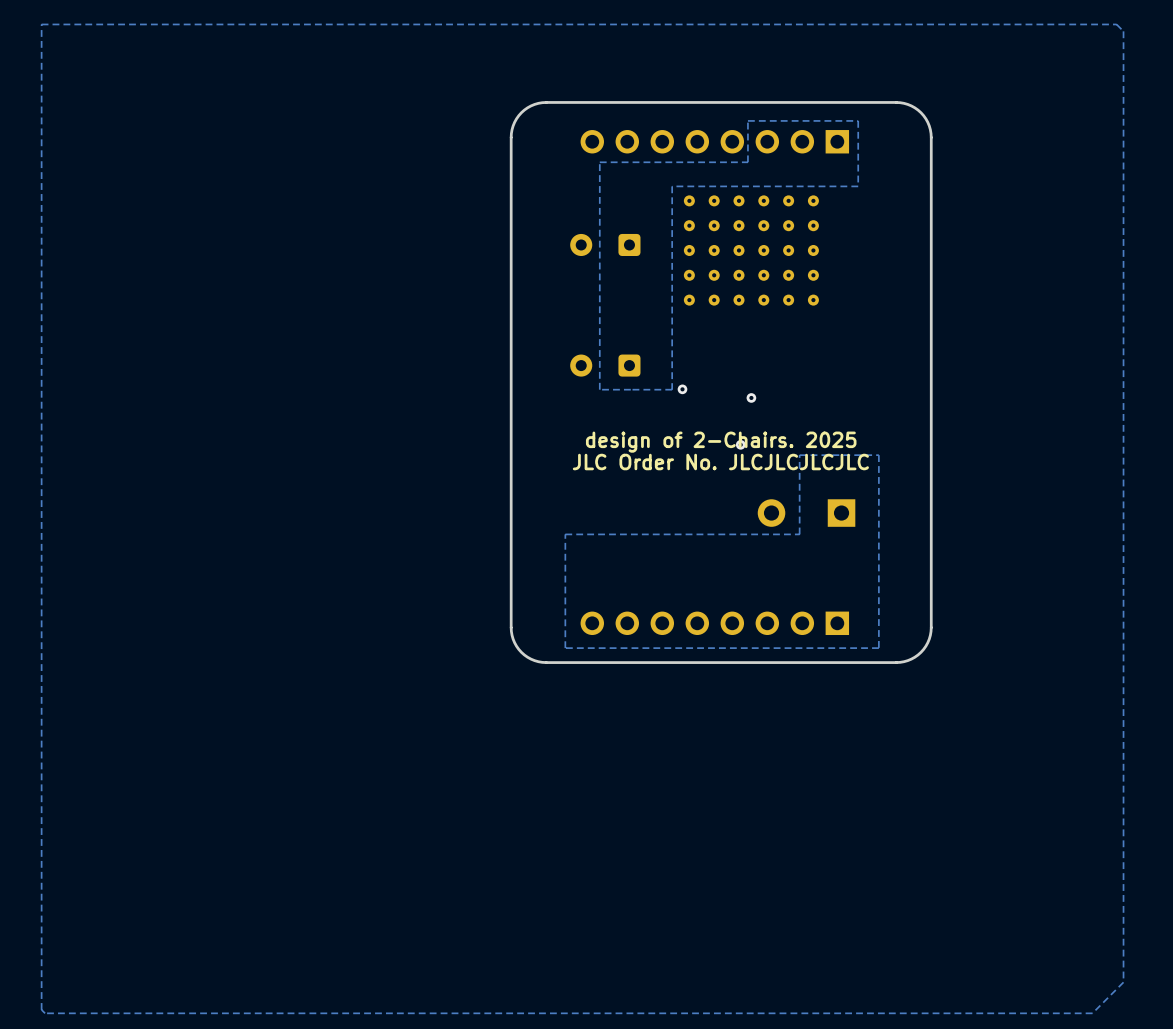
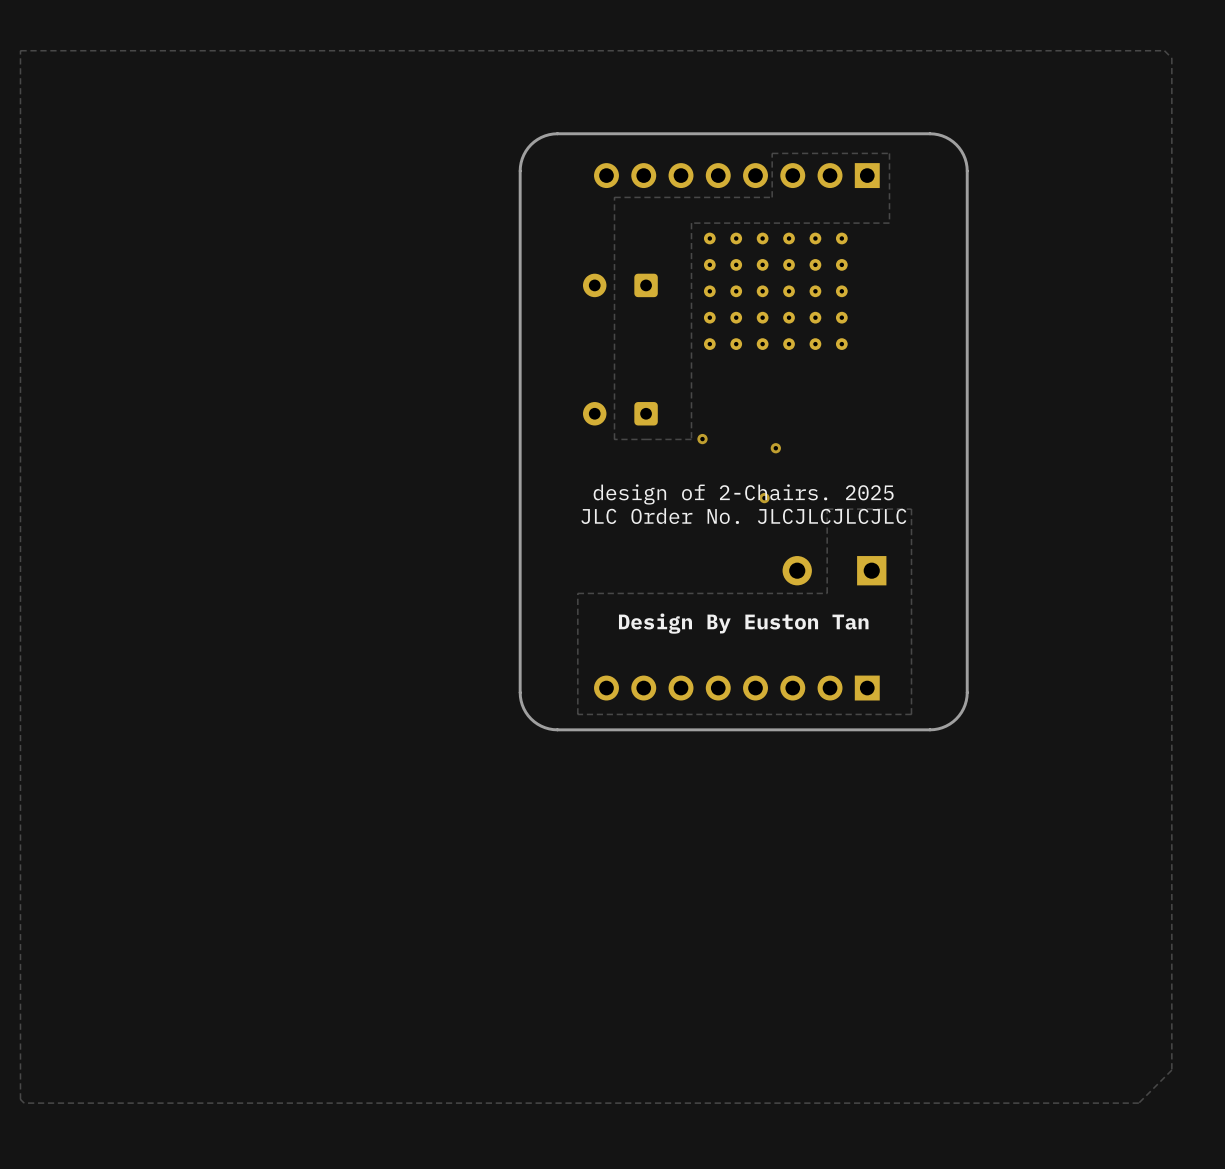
text: none -> Design By Euston Tan (743, 623)

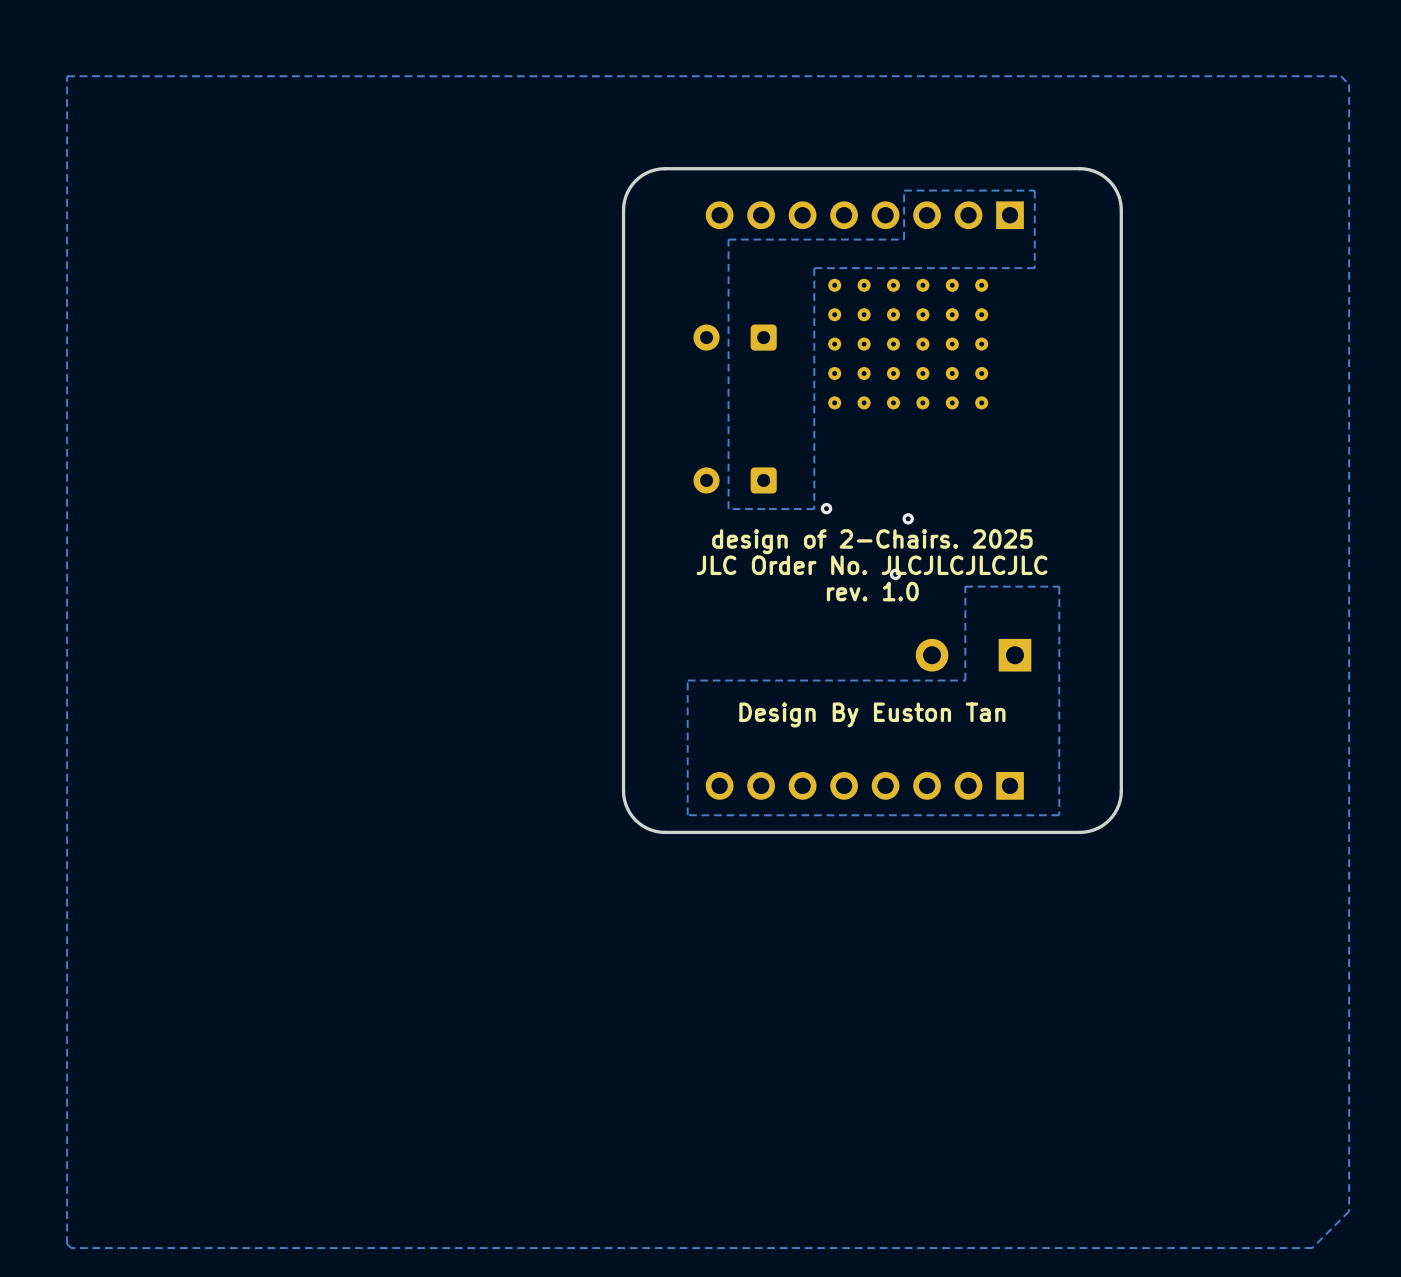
text: none -> design of 2-Chairs. 2025 (872, 541)
text: design of 2-Chairs. 2025 (743, 494) -> JLC Order No. JLCJLCJLCJLC (872, 565)
text: JLC Order No. JLCJLCJLCJLC (743, 516) -> rev. 1.0 (872, 591)

